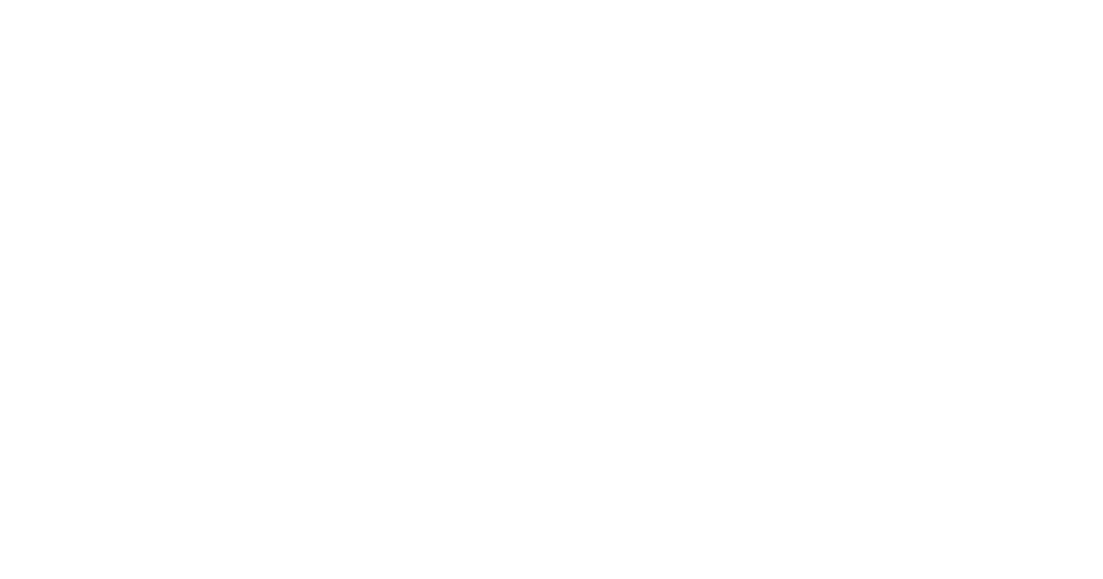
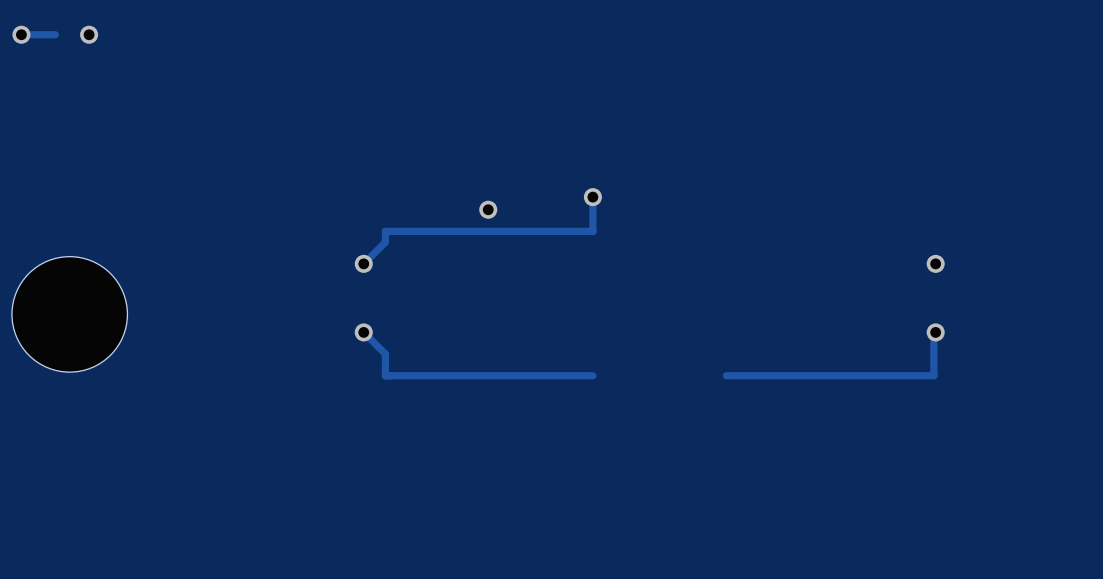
track: none -> (21, 34) (55, 34)
via: none -> (21, 34)
via: none -> (89, 34)
track: none -> (592, 197) (592, 231) (385, 231) (385, 242) (363, 263)
via: none -> (592, 197)
via: none -> (488, 209)
via: none -> (363, 263)
via: none -> (935, 263)
part: none -> (69, 314)
track: none -> (363, 332) (385, 354) (385, 375) (592, 375)
via: none -> (363, 332)
track: none -> (935, 332) (933, 334) (933, 375) (726, 375)
via: none -> (935, 332)

